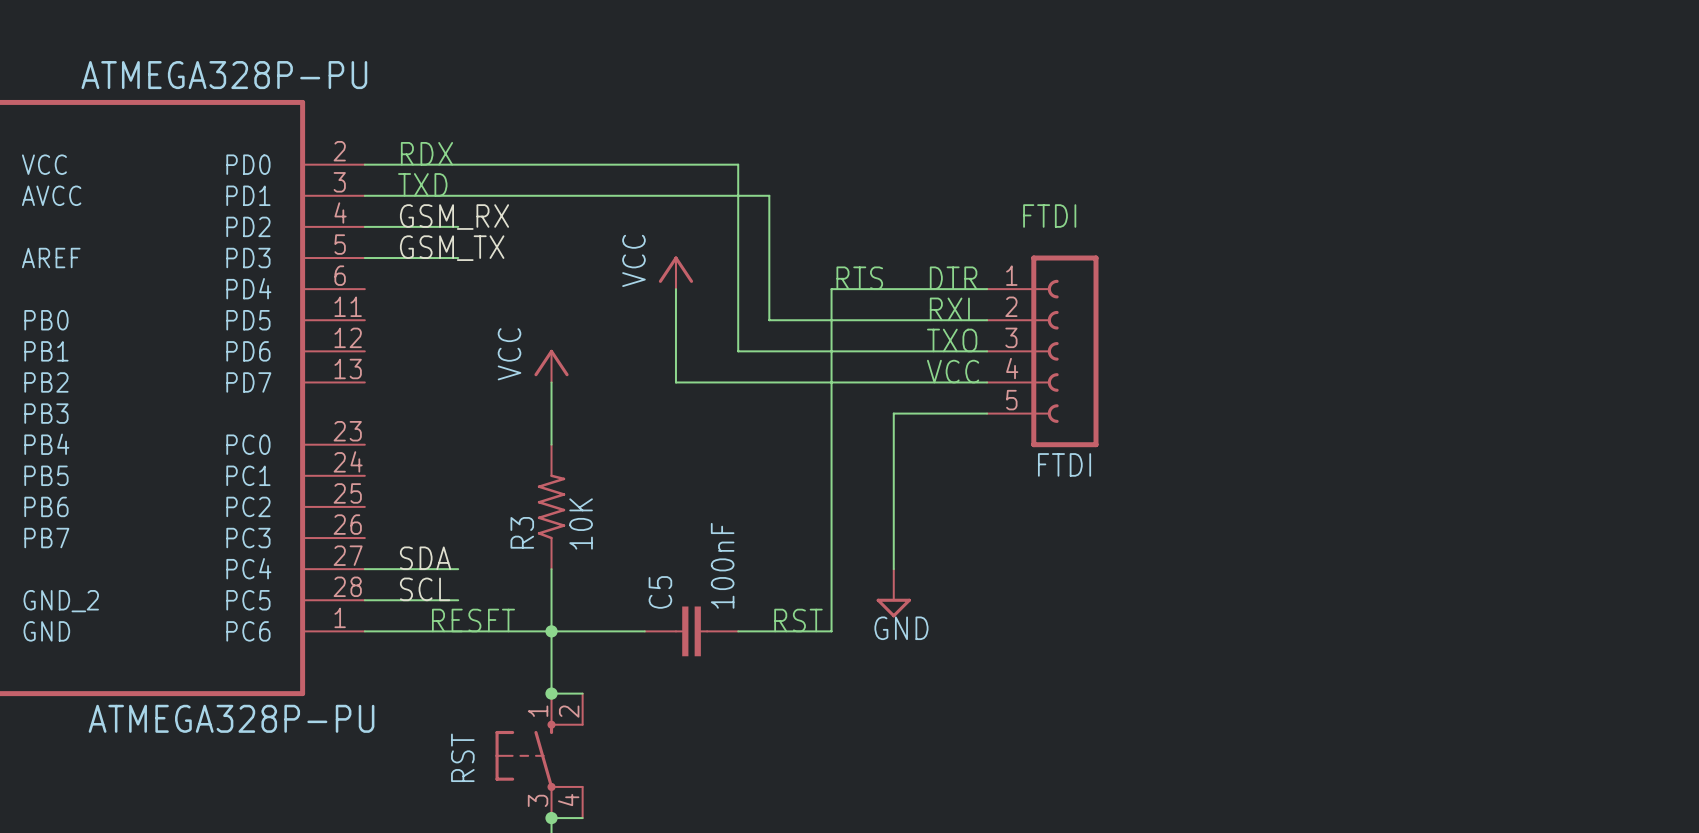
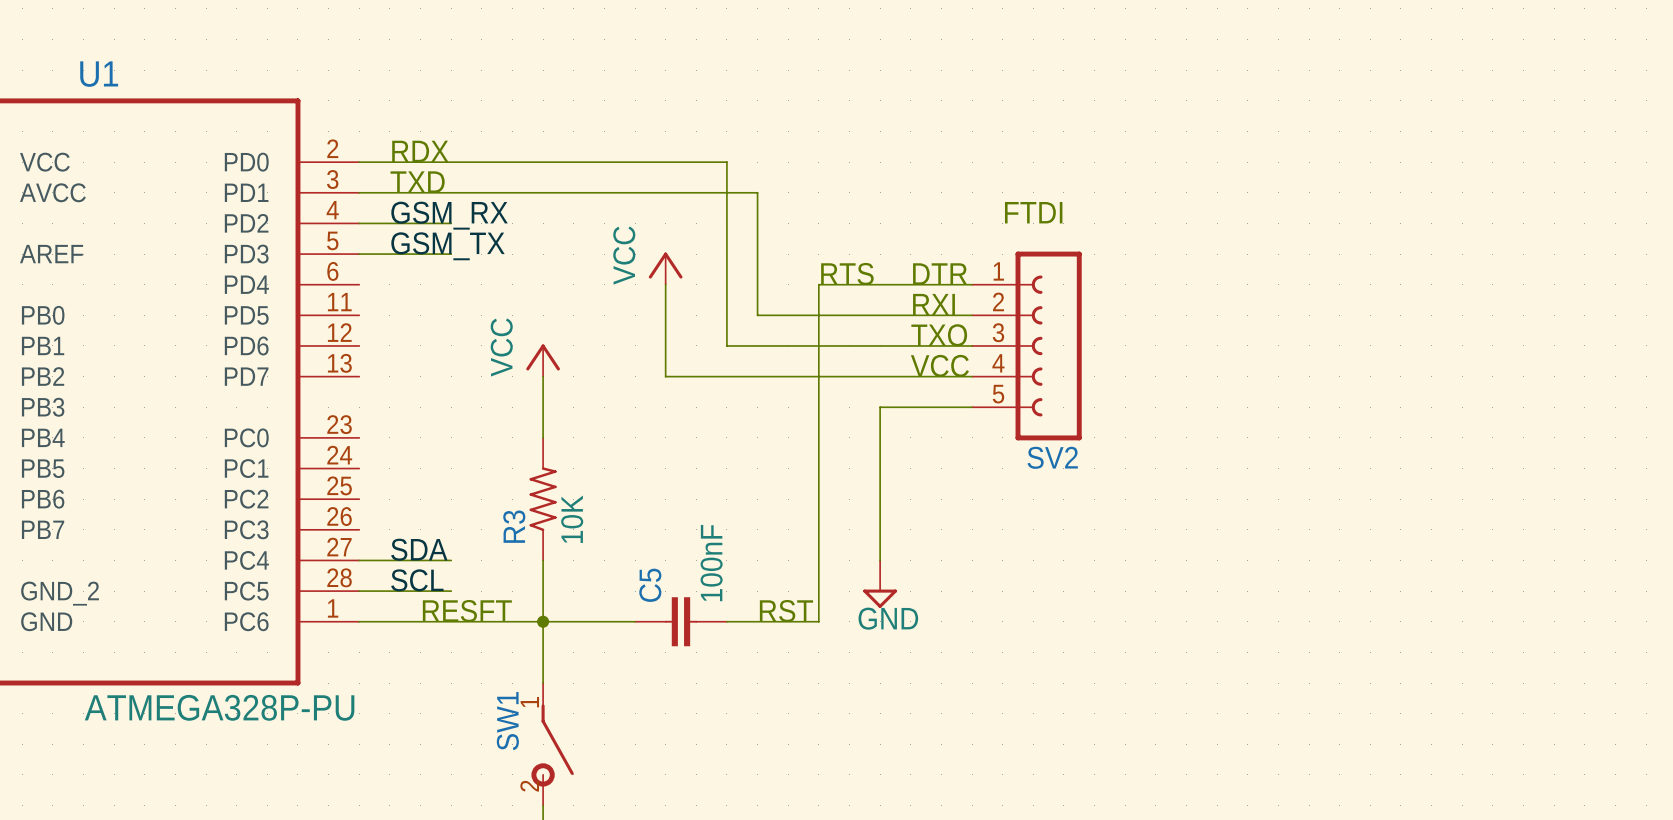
ATMEGA328P-PU name: ATMEGA328P-PU (224, 75) -> U1 (99, 74)
FTDI name: FTDI (1064, 464) -> SV2 (1052, 457)
wire: (551, 693) (582, 693) -> none
junction: (551, 693) -> none
RST: (539, 755) -> none
SW1: none -> (552, 744)
wire: (551, 818) (582, 818) -> none
junction: (551, 818) -> none

